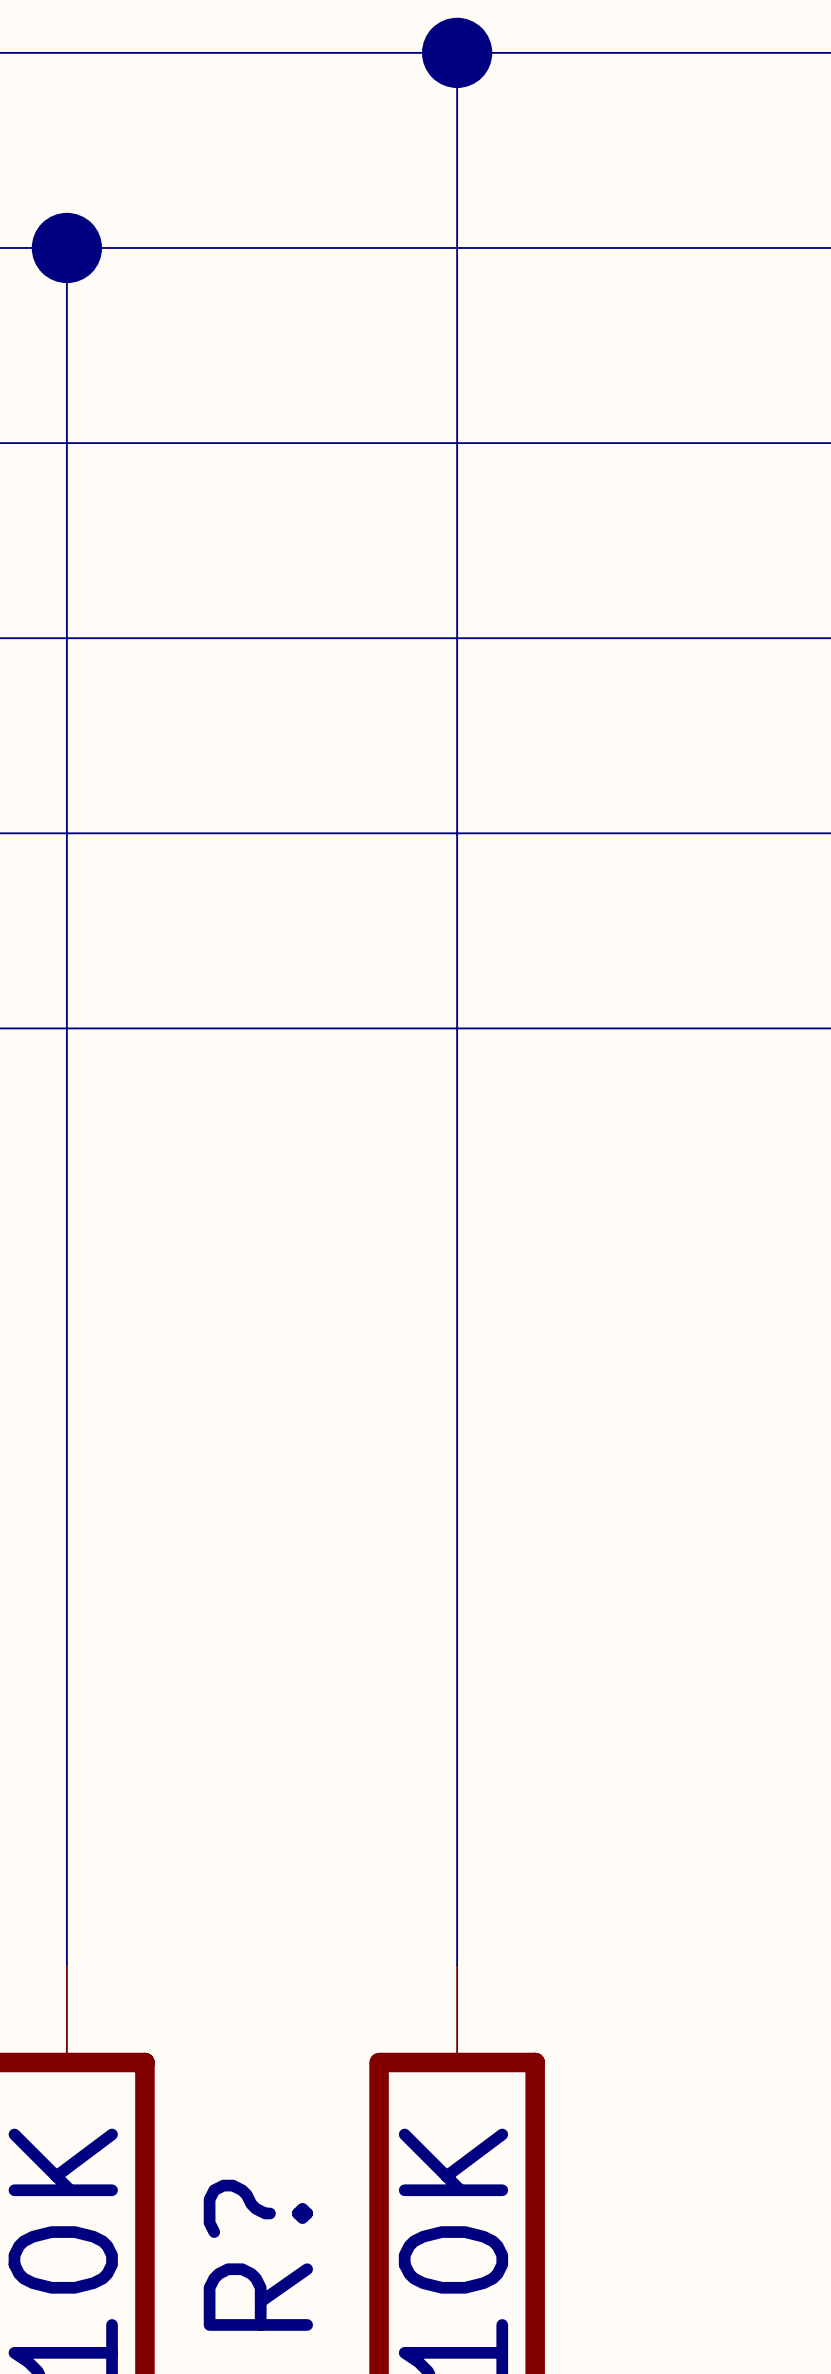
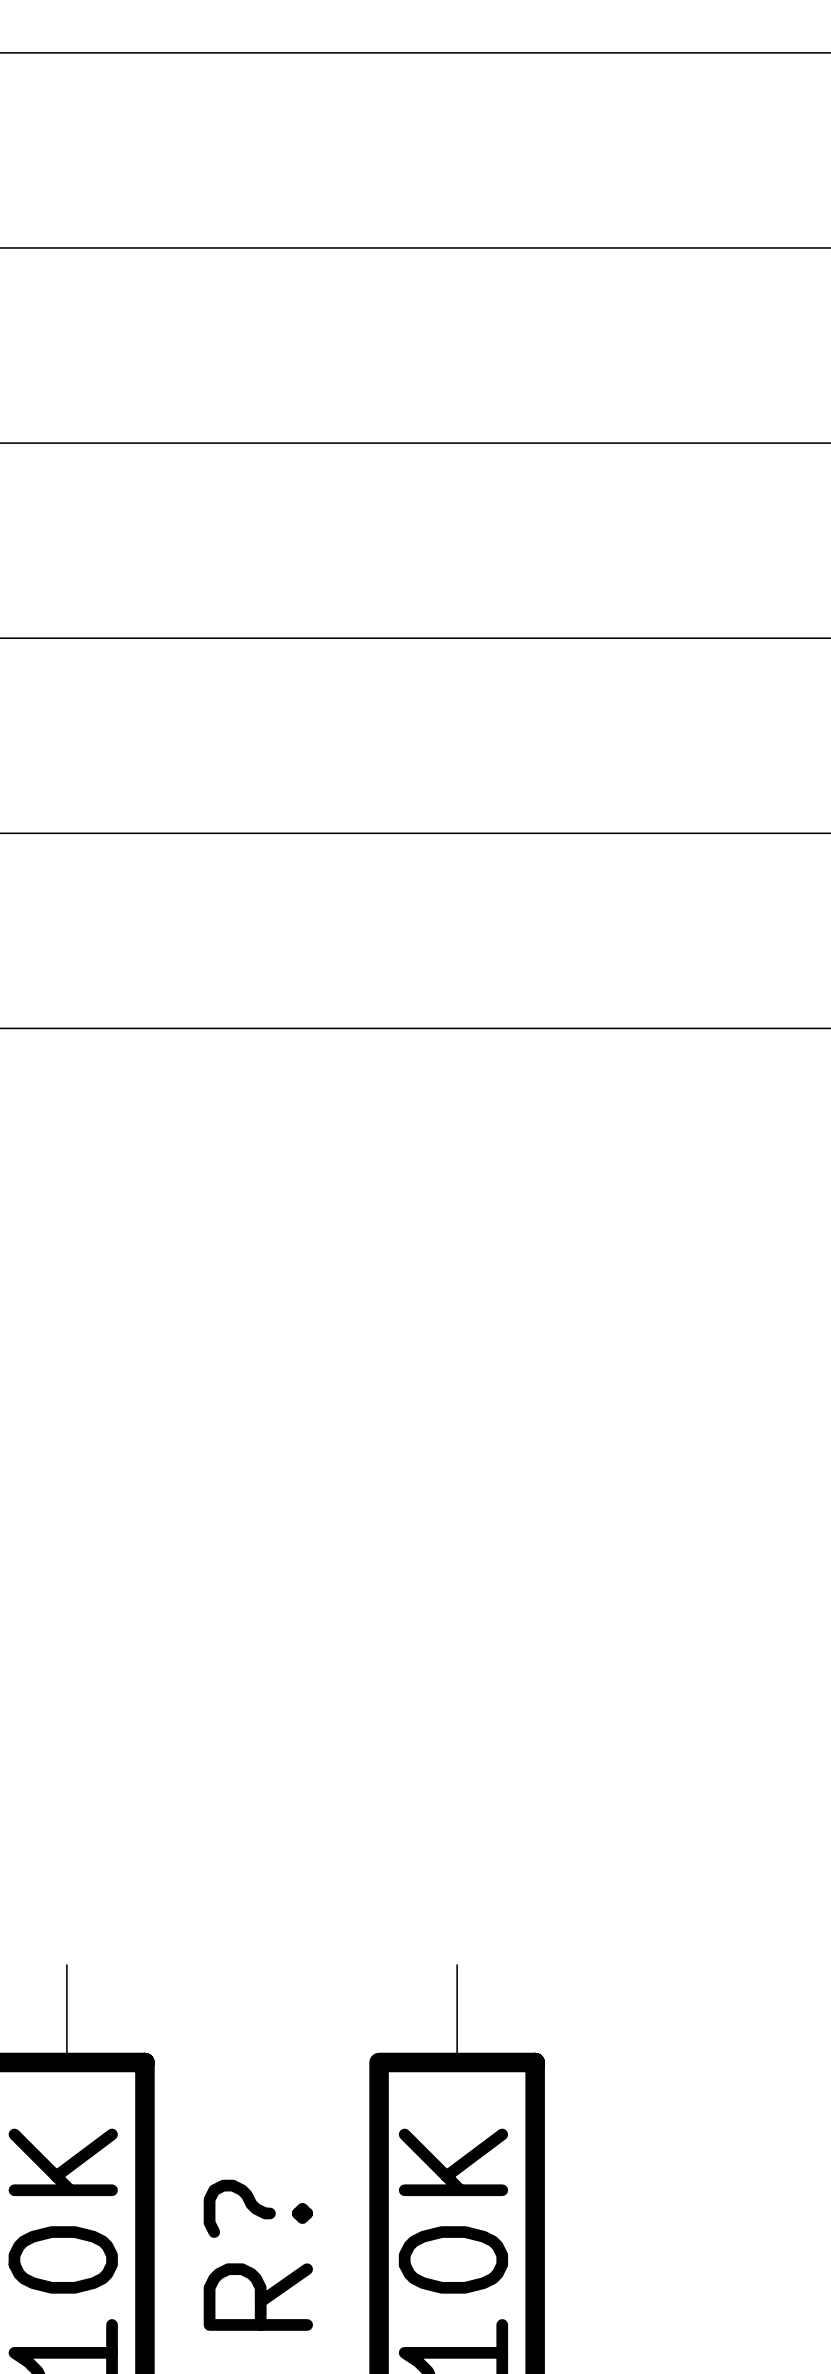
wire: (457, 52) (457, 1964) -> none
junction: (457, 52) -> none
wire: (66, 247) (66, 1964) -> none
junction: (66, 247) -> none

